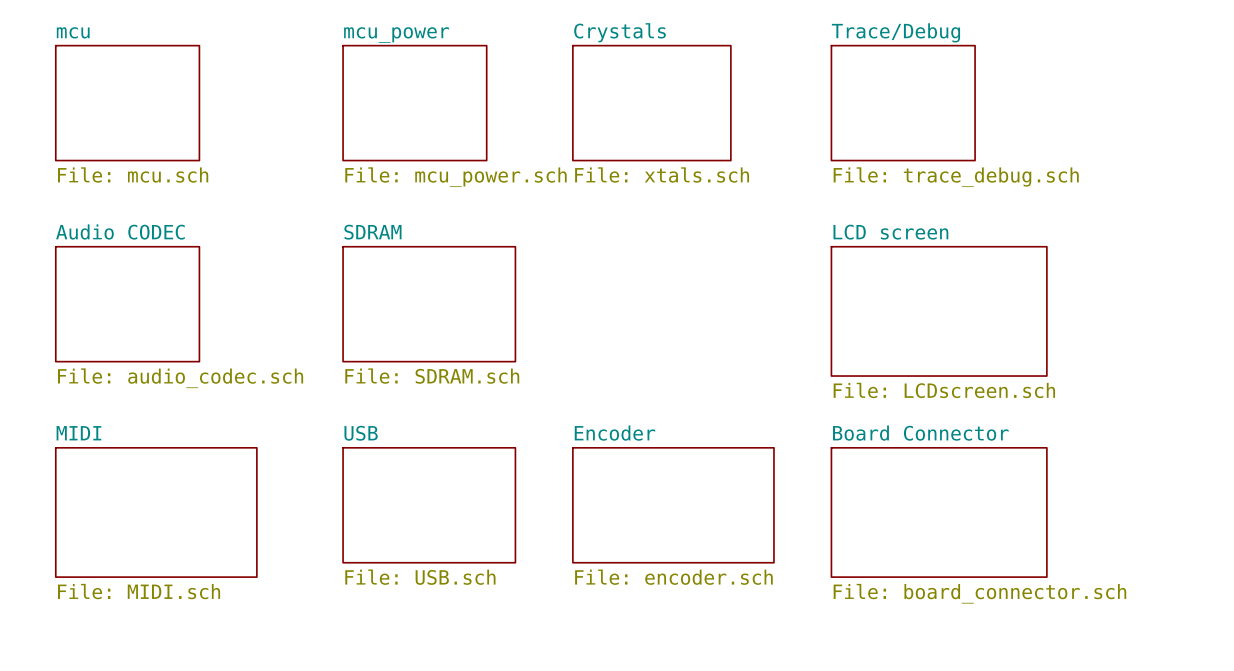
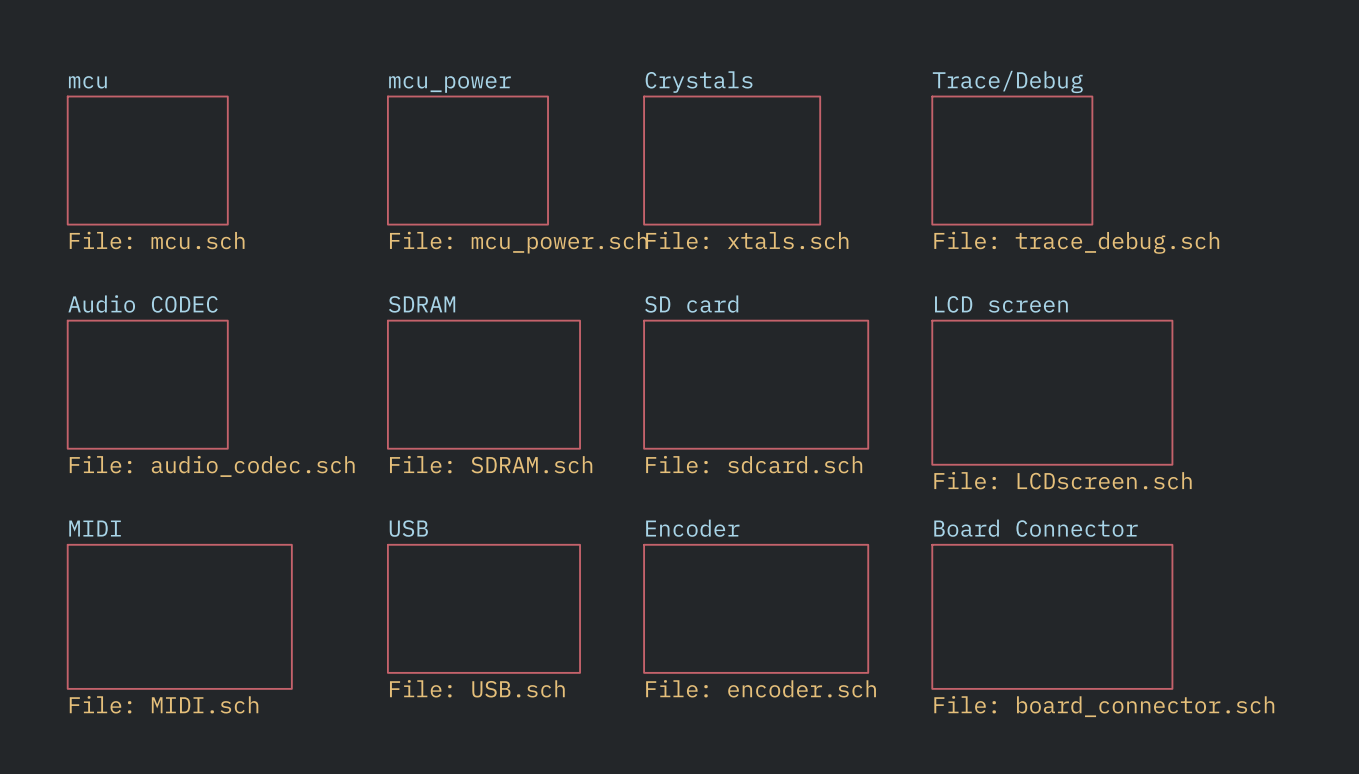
sheet SD card: none -> File: sdcard.sch (756, 384)

